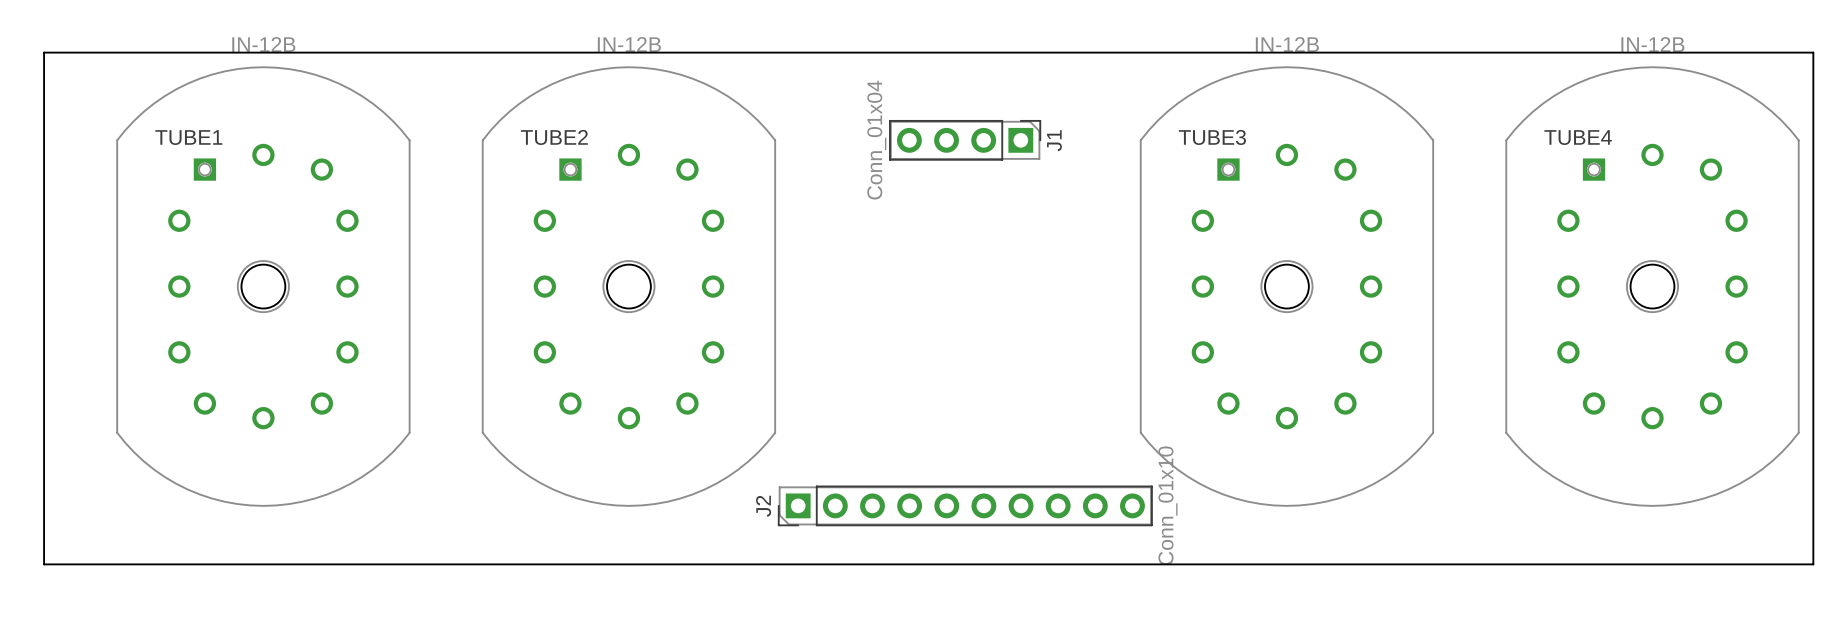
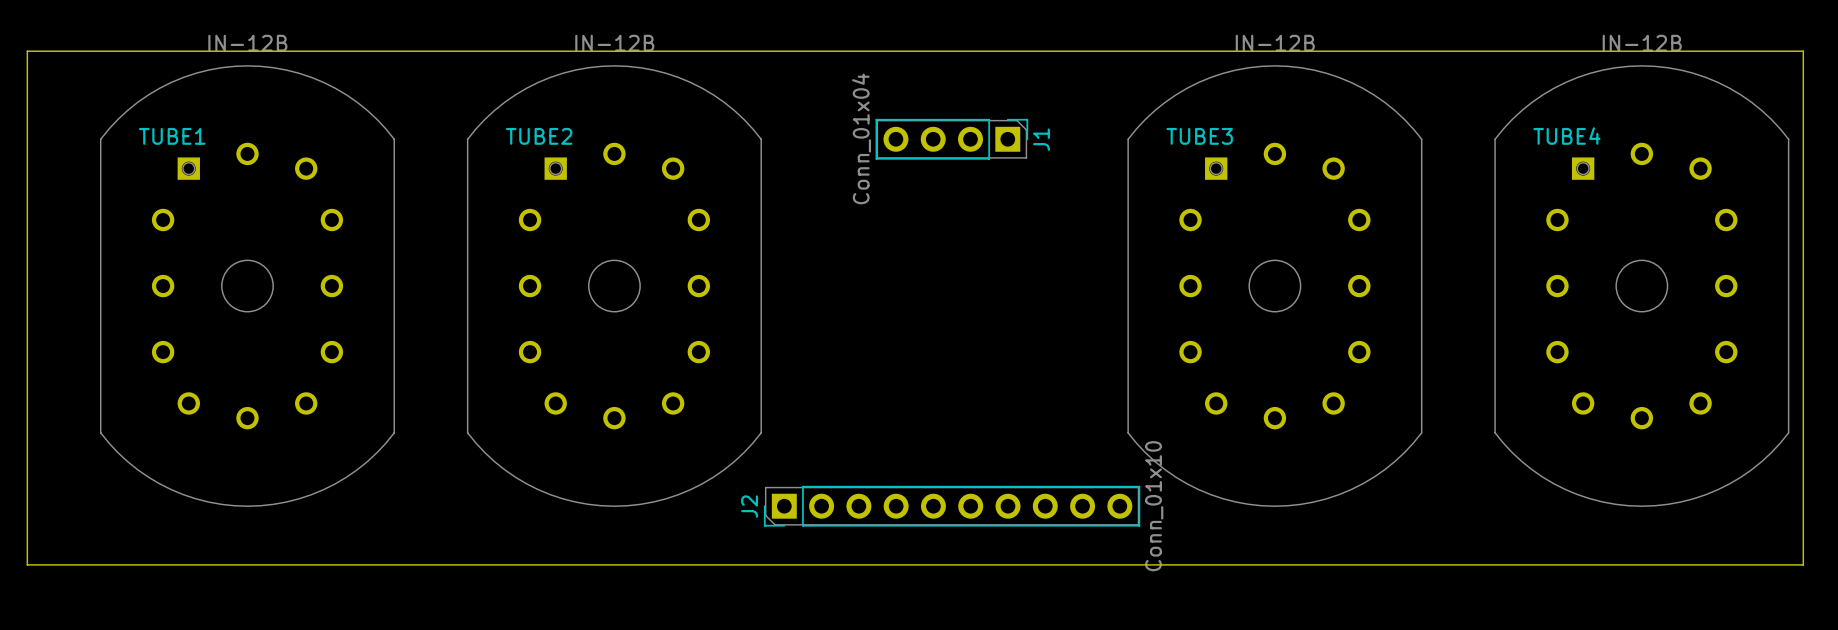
round board edge: [240, 263, 287, 310] -> none
round board edge: [606, 263, 652, 310] -> none
round board edge: [1264, 263, 1310, 310] -> none
round board edge: [1629, 263, 1676, 310] -> none

